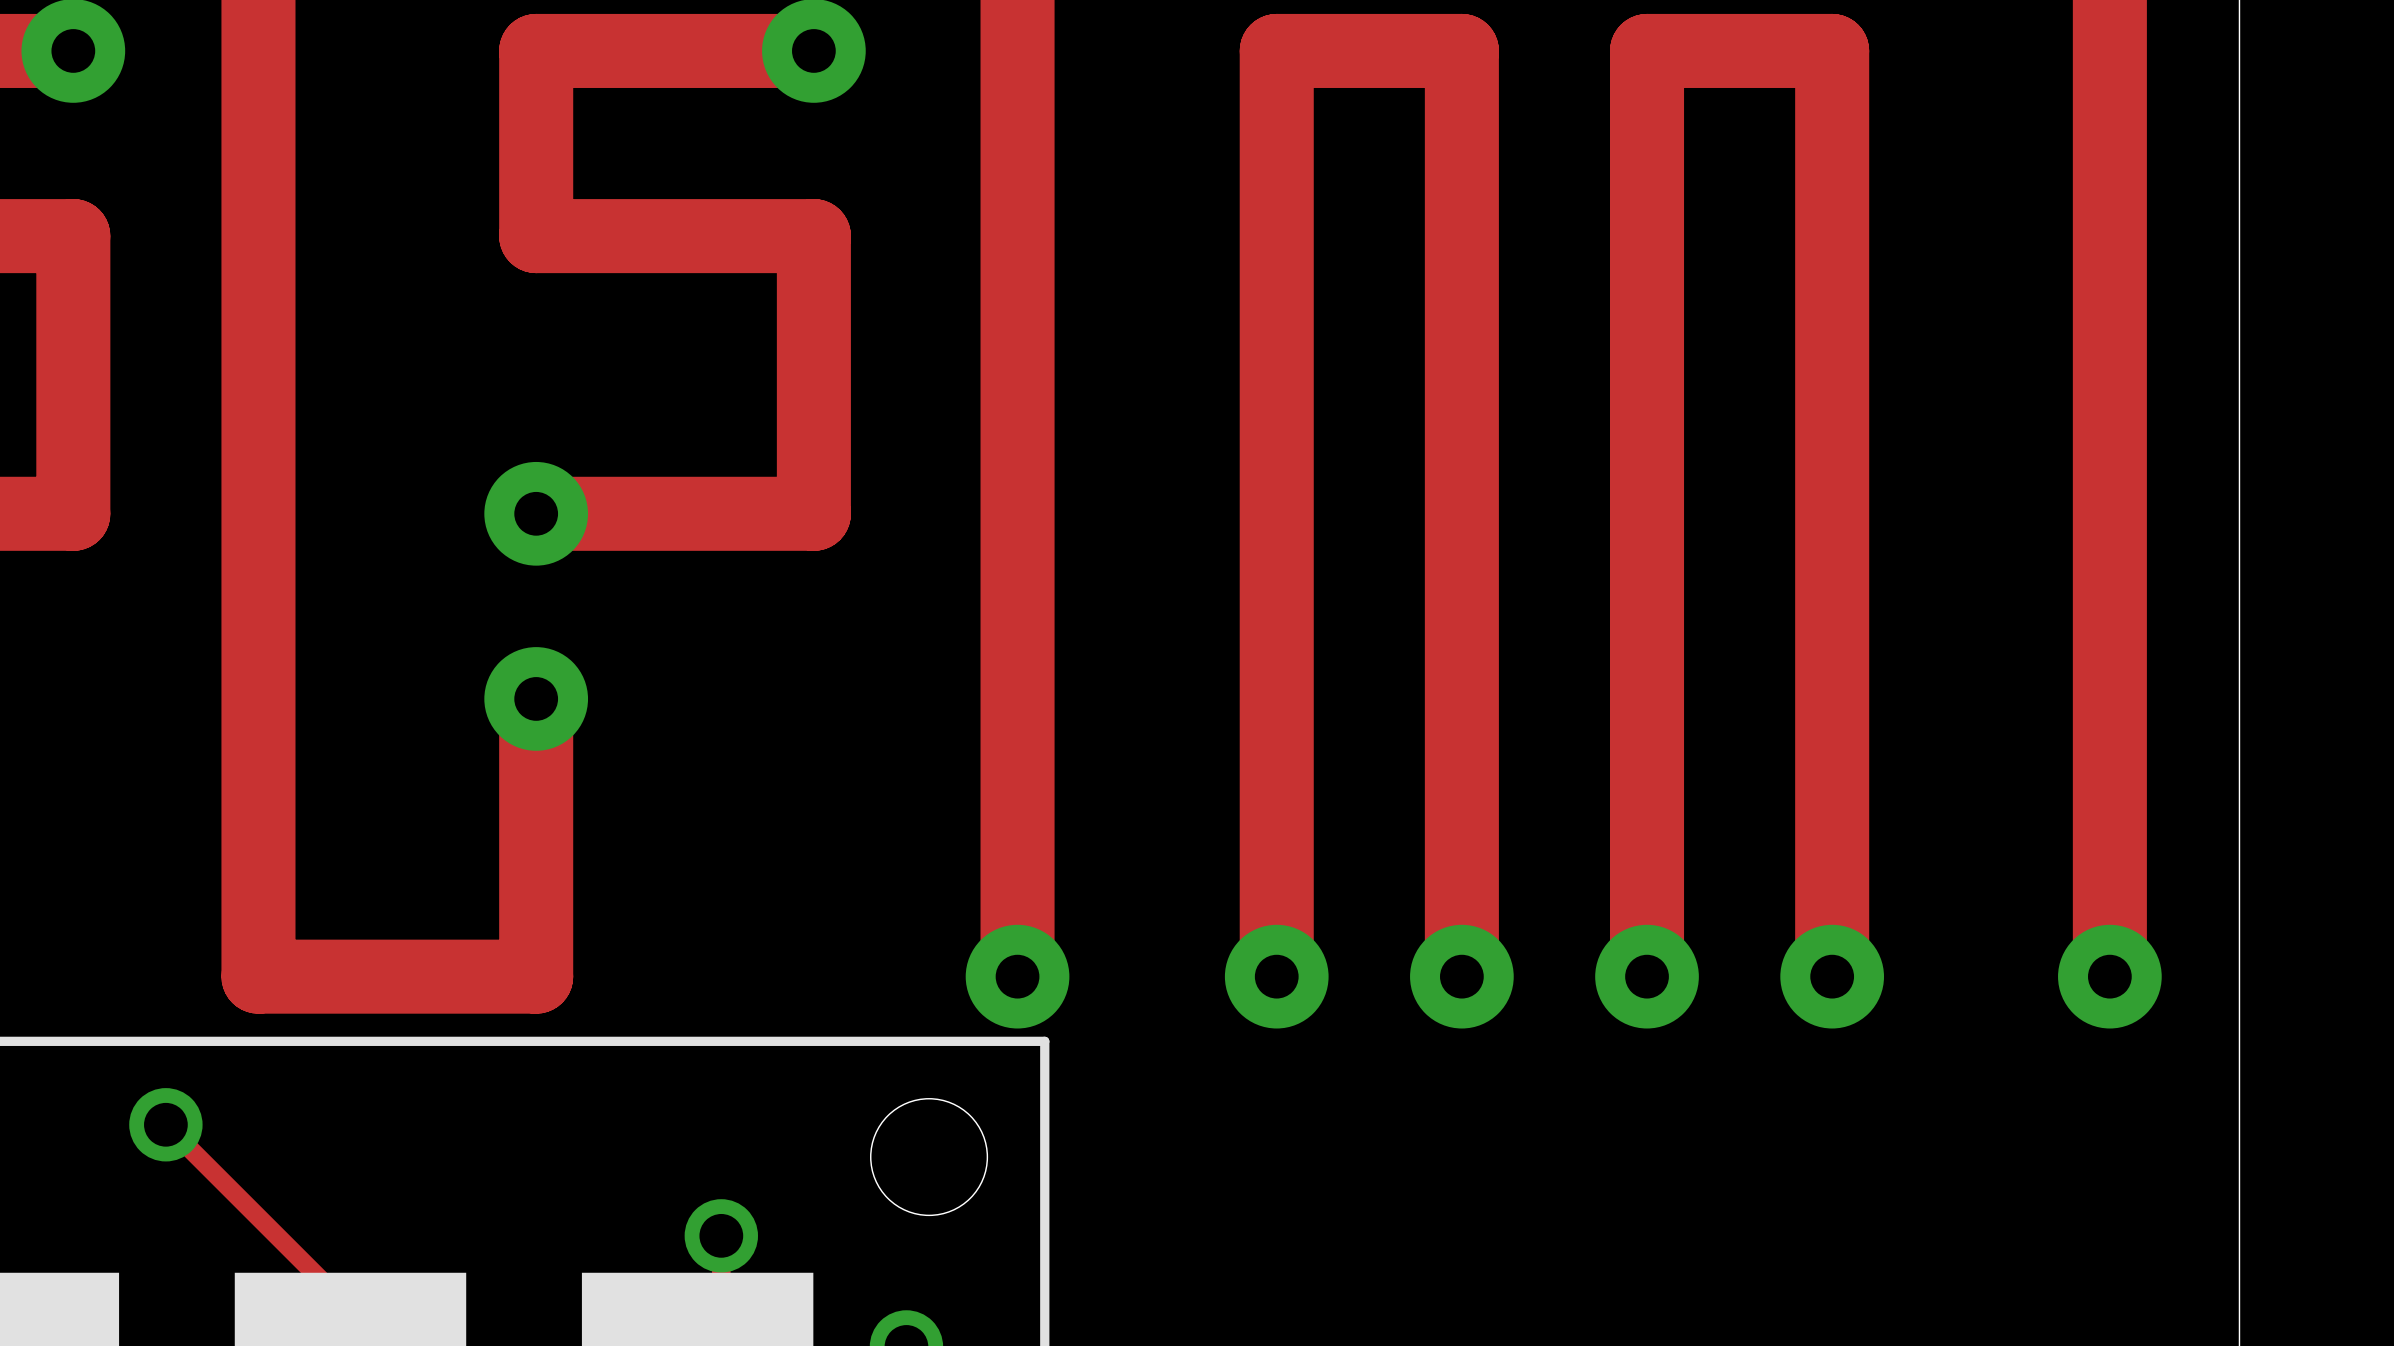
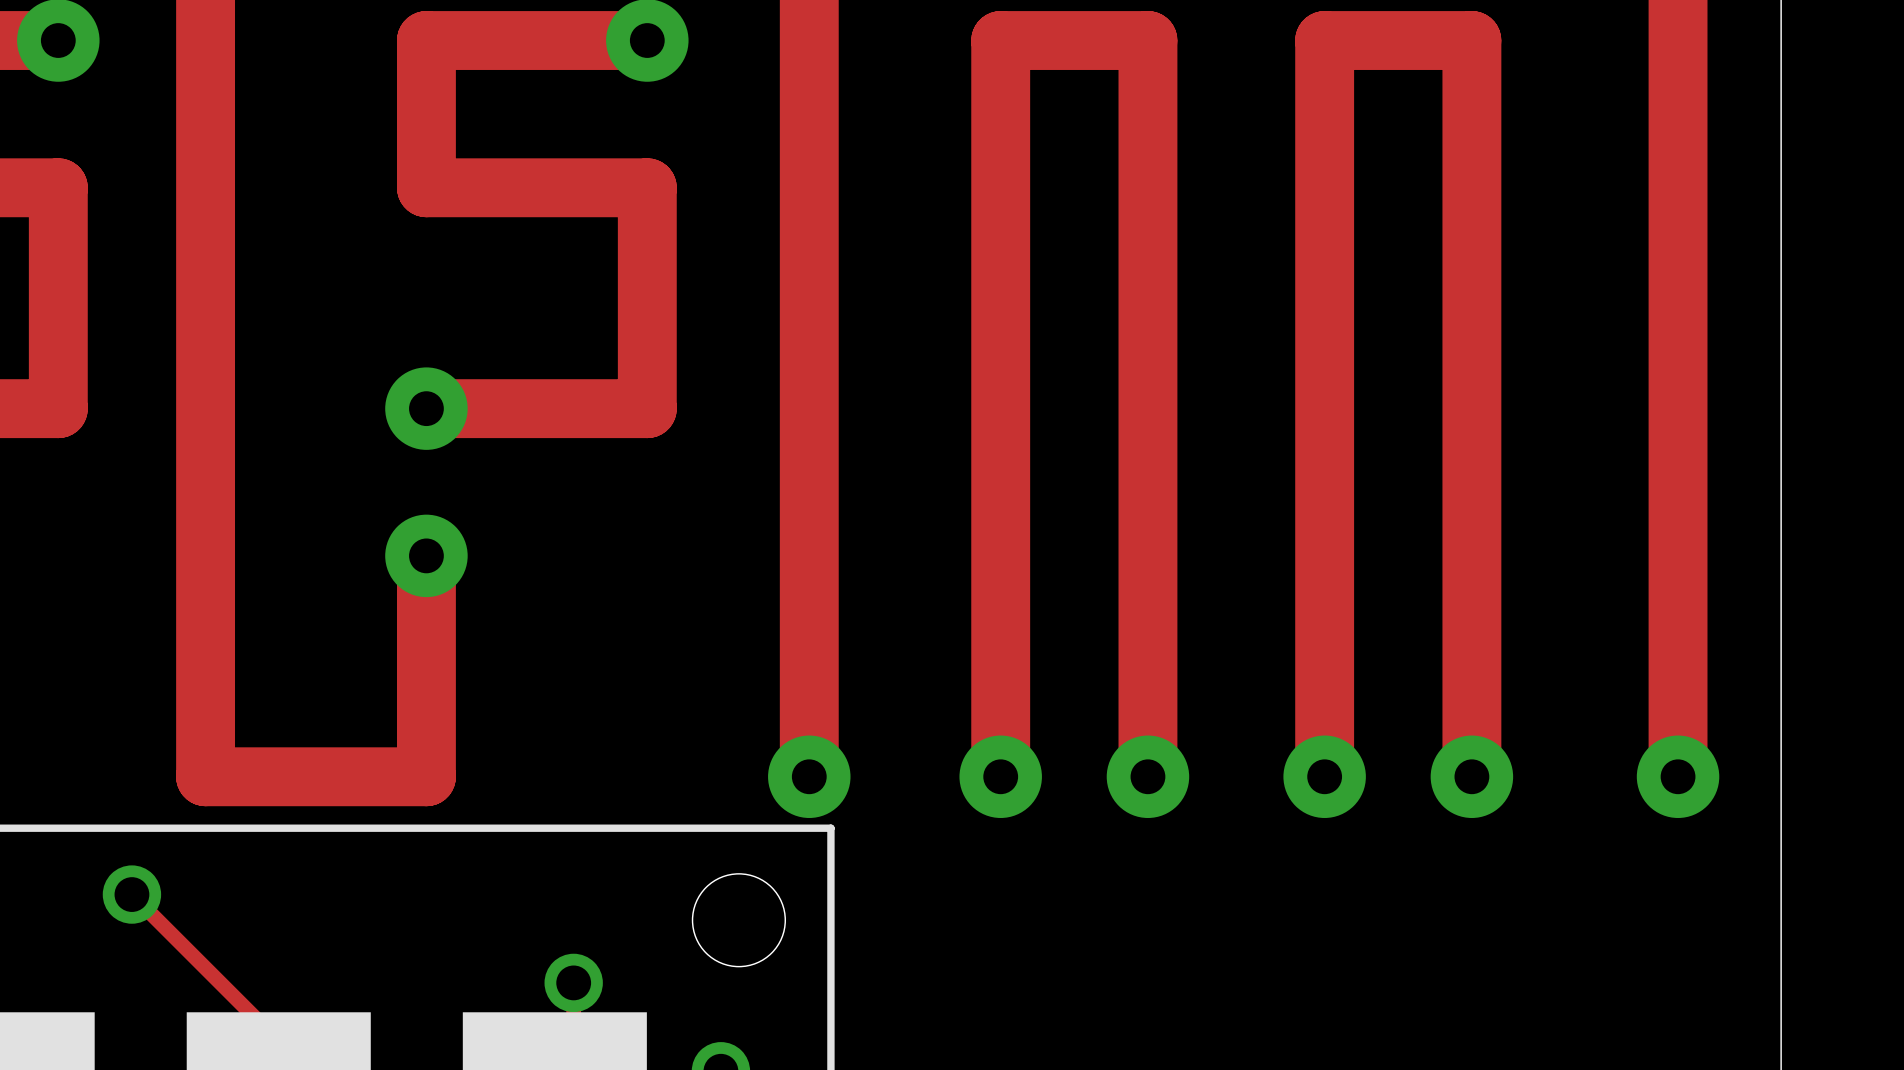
track: (1276, 50) (1276, 976) -> (1015, 40) (1000, 40) (1000, 776)
track: (1443, 50) (1461, 50) (1461, 976) -> (1147, 40) (1147, 776)
track: (1665, 50) (1647, 50) (1647, 976) -> (1324, 40) (1324, 776)
track: (1832, 50) (1832, 976) -> (1457, 40) (1471, 40) (1471, 776)
via position: (1276, 976) -> (1000, 776)
via position: (1461, 976) -> (1147, 776)
via position: (1647, 976) -> (1324, 776)
via position: (1832, 976) -> (1471, 776)

